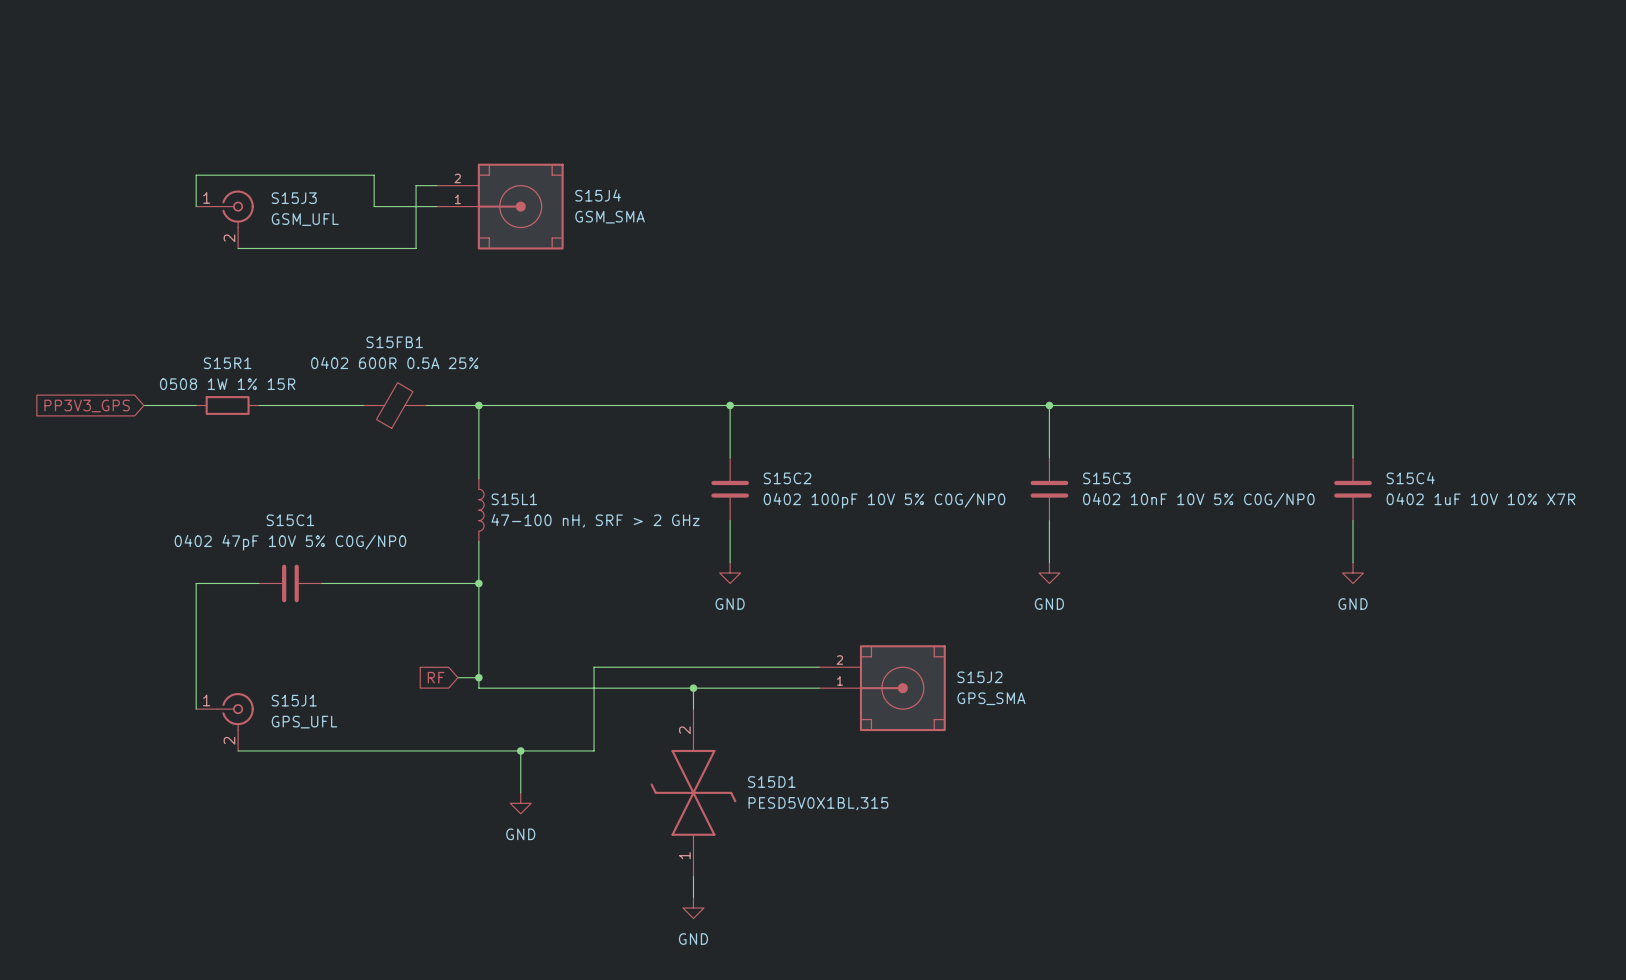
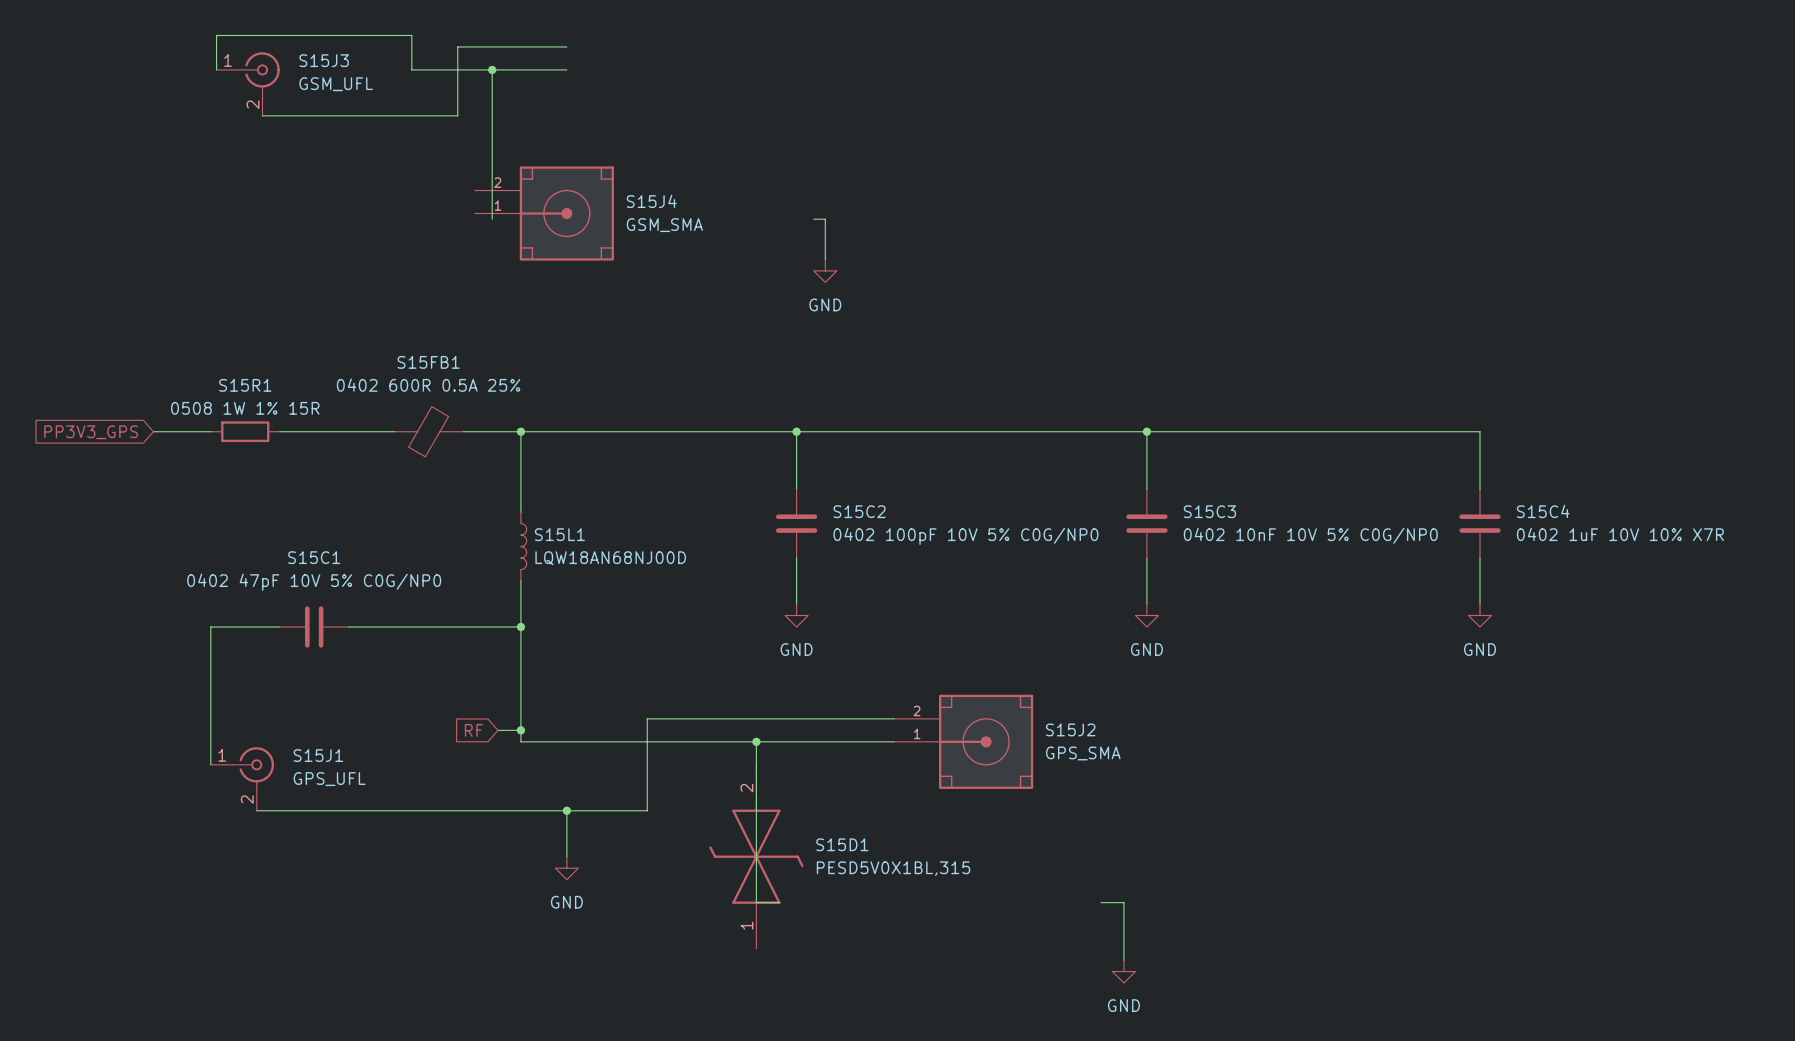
wire: none -> (566, 46) (457, 46) (457, 115) (262, 115)
wire: none -> (216, 69) (216, 35) (411, 35) (411, 69) (566, 69)
wire: none -> (492, 69) (492, 219)
junction: none -> (492, 69)
wire: (436, 185) (416, 185) (416, 248) (238, 248) -> none
wire: (196, 206) (196, 175) (374, 175) (374, 206) (436, 206) -> none
wire: none -> (813, 219) (825, 219) (825, 259)
S15J3 position: (225, 219) -> (248, 84)
power symbol: none -> GND (825, 270)
S15L1 value: 47-100 nH, SRF > 2 GHz (595, 520) -> LQW18AN68NJ00D (610, 558)
wire: none -> (756, 764) (756, 902) (779, 902)
wire: none -> (1100, 902) (1123, 902) (1123, 960)
wire: (693, 876) (693, 897) -> none
power symbol: none -> GND (1123, 971)
power symbol: GND (693, 908) -> none

